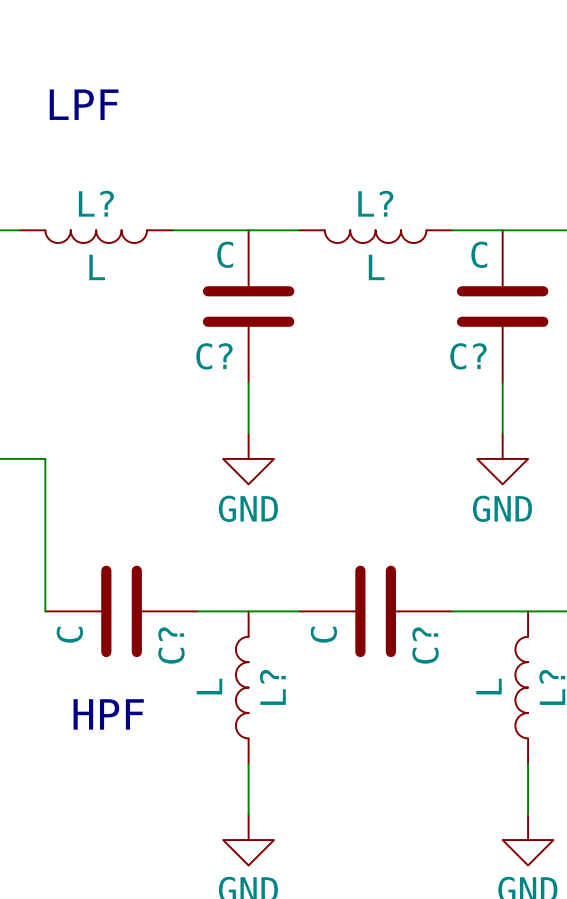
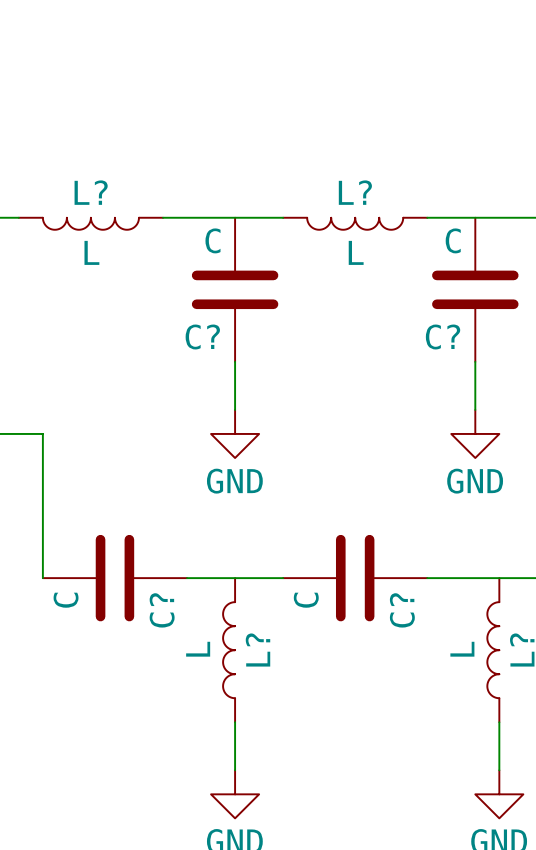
text: LPF (84, 104) -> none
text: HPF (108, 714) -> none

